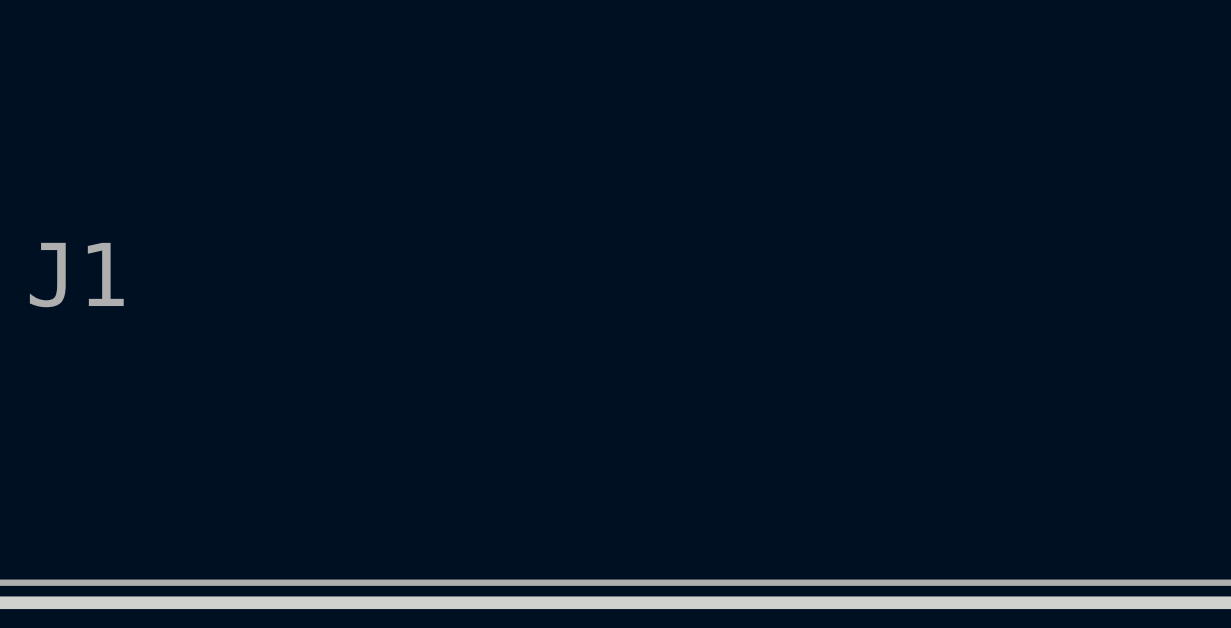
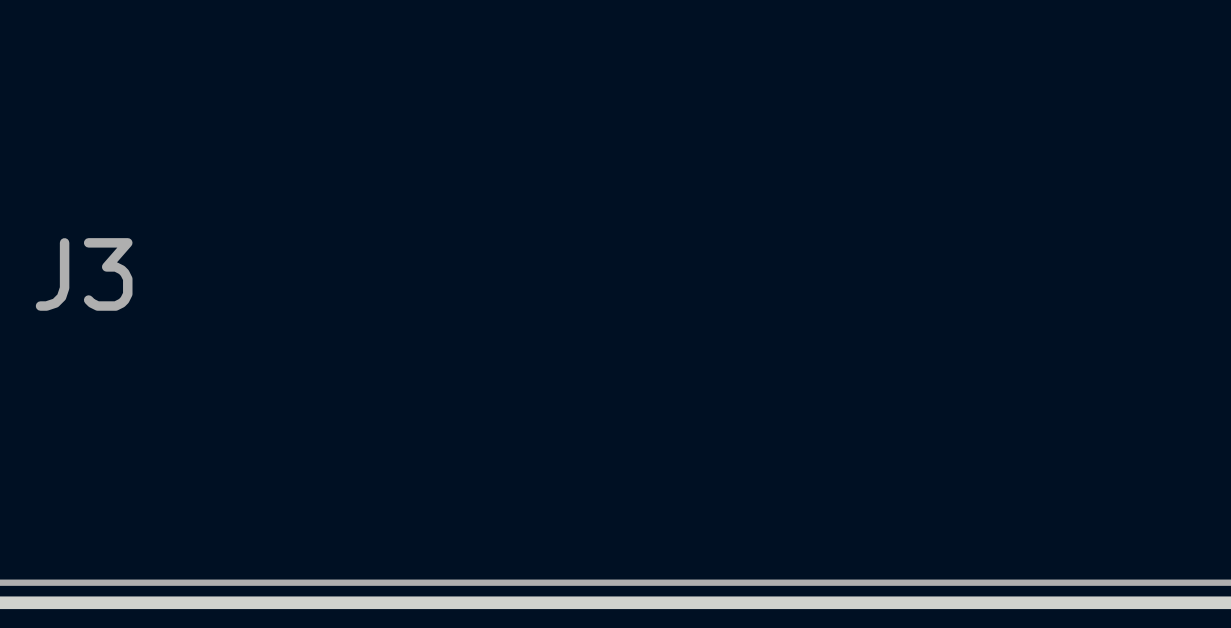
J1 name: J1 (76, 275) -> J3 (84, 274)

